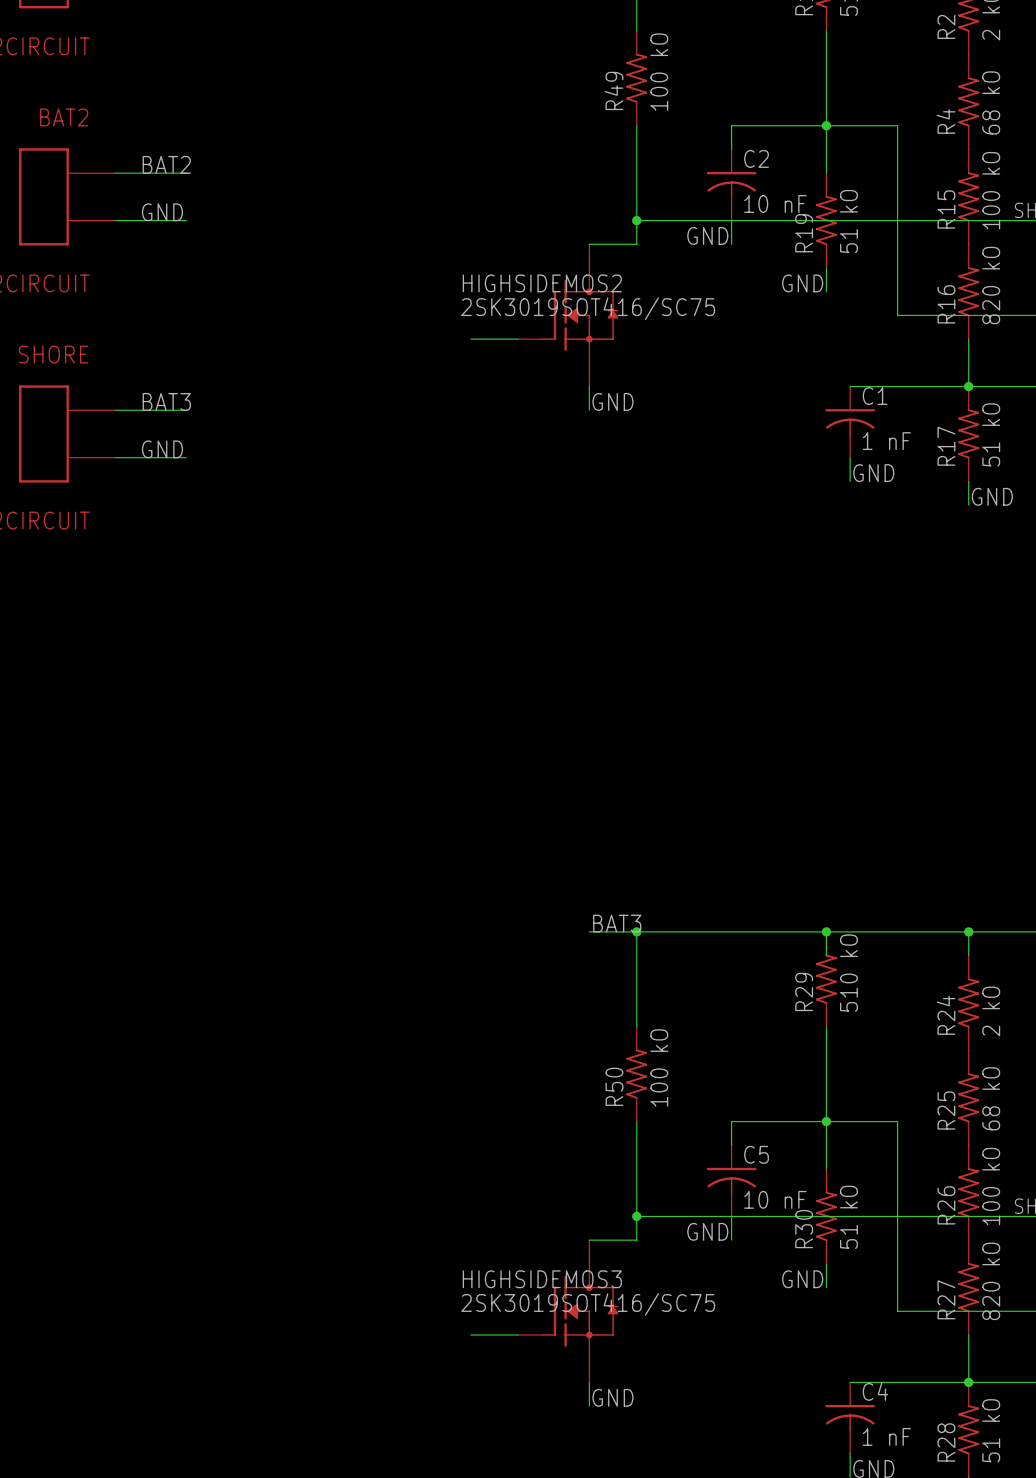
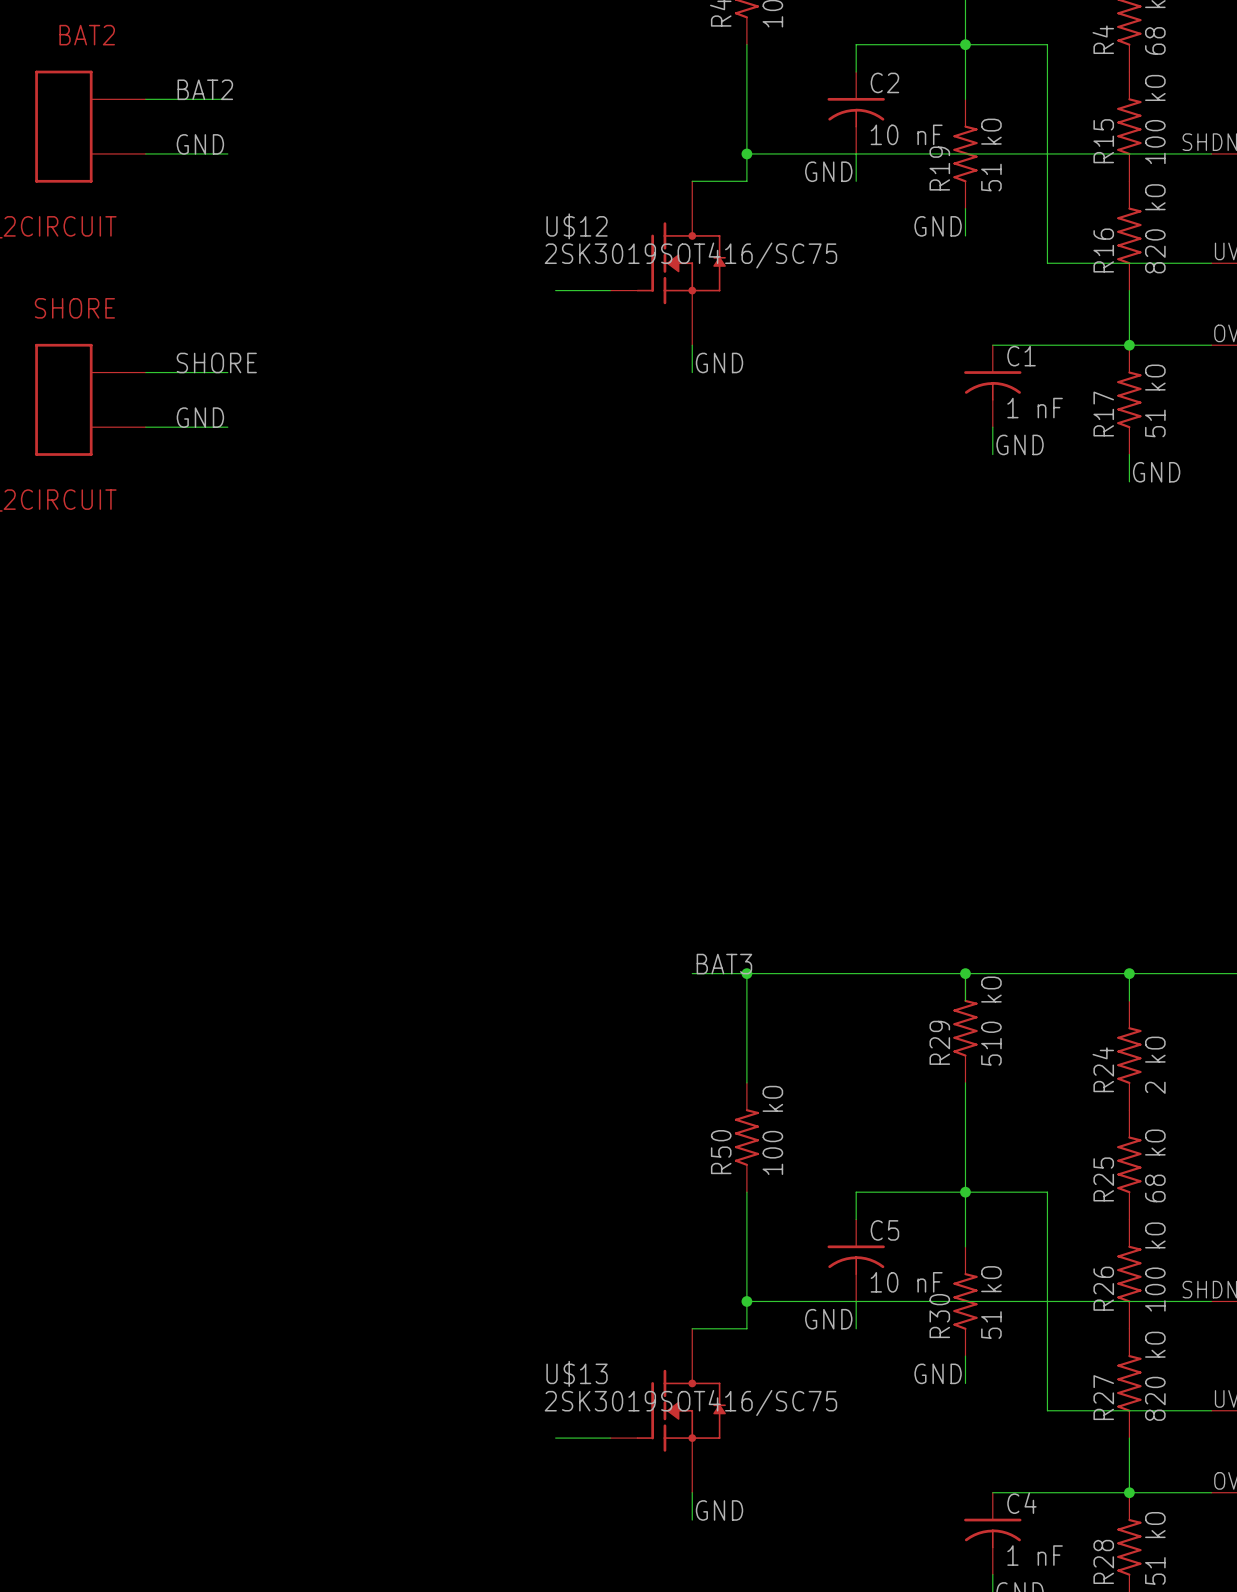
HIGHSIDEMOS2 name: HIGHSIDEMOS2 (542, 283) -> U$12 (577, 226)
label: BAT3 (166, 401) -> SHORE (216, 362)
HIGHSIDEMOS3 name: HIGHSIDEMOS3 (542, 1279) -> U$13 (577, 1373)

